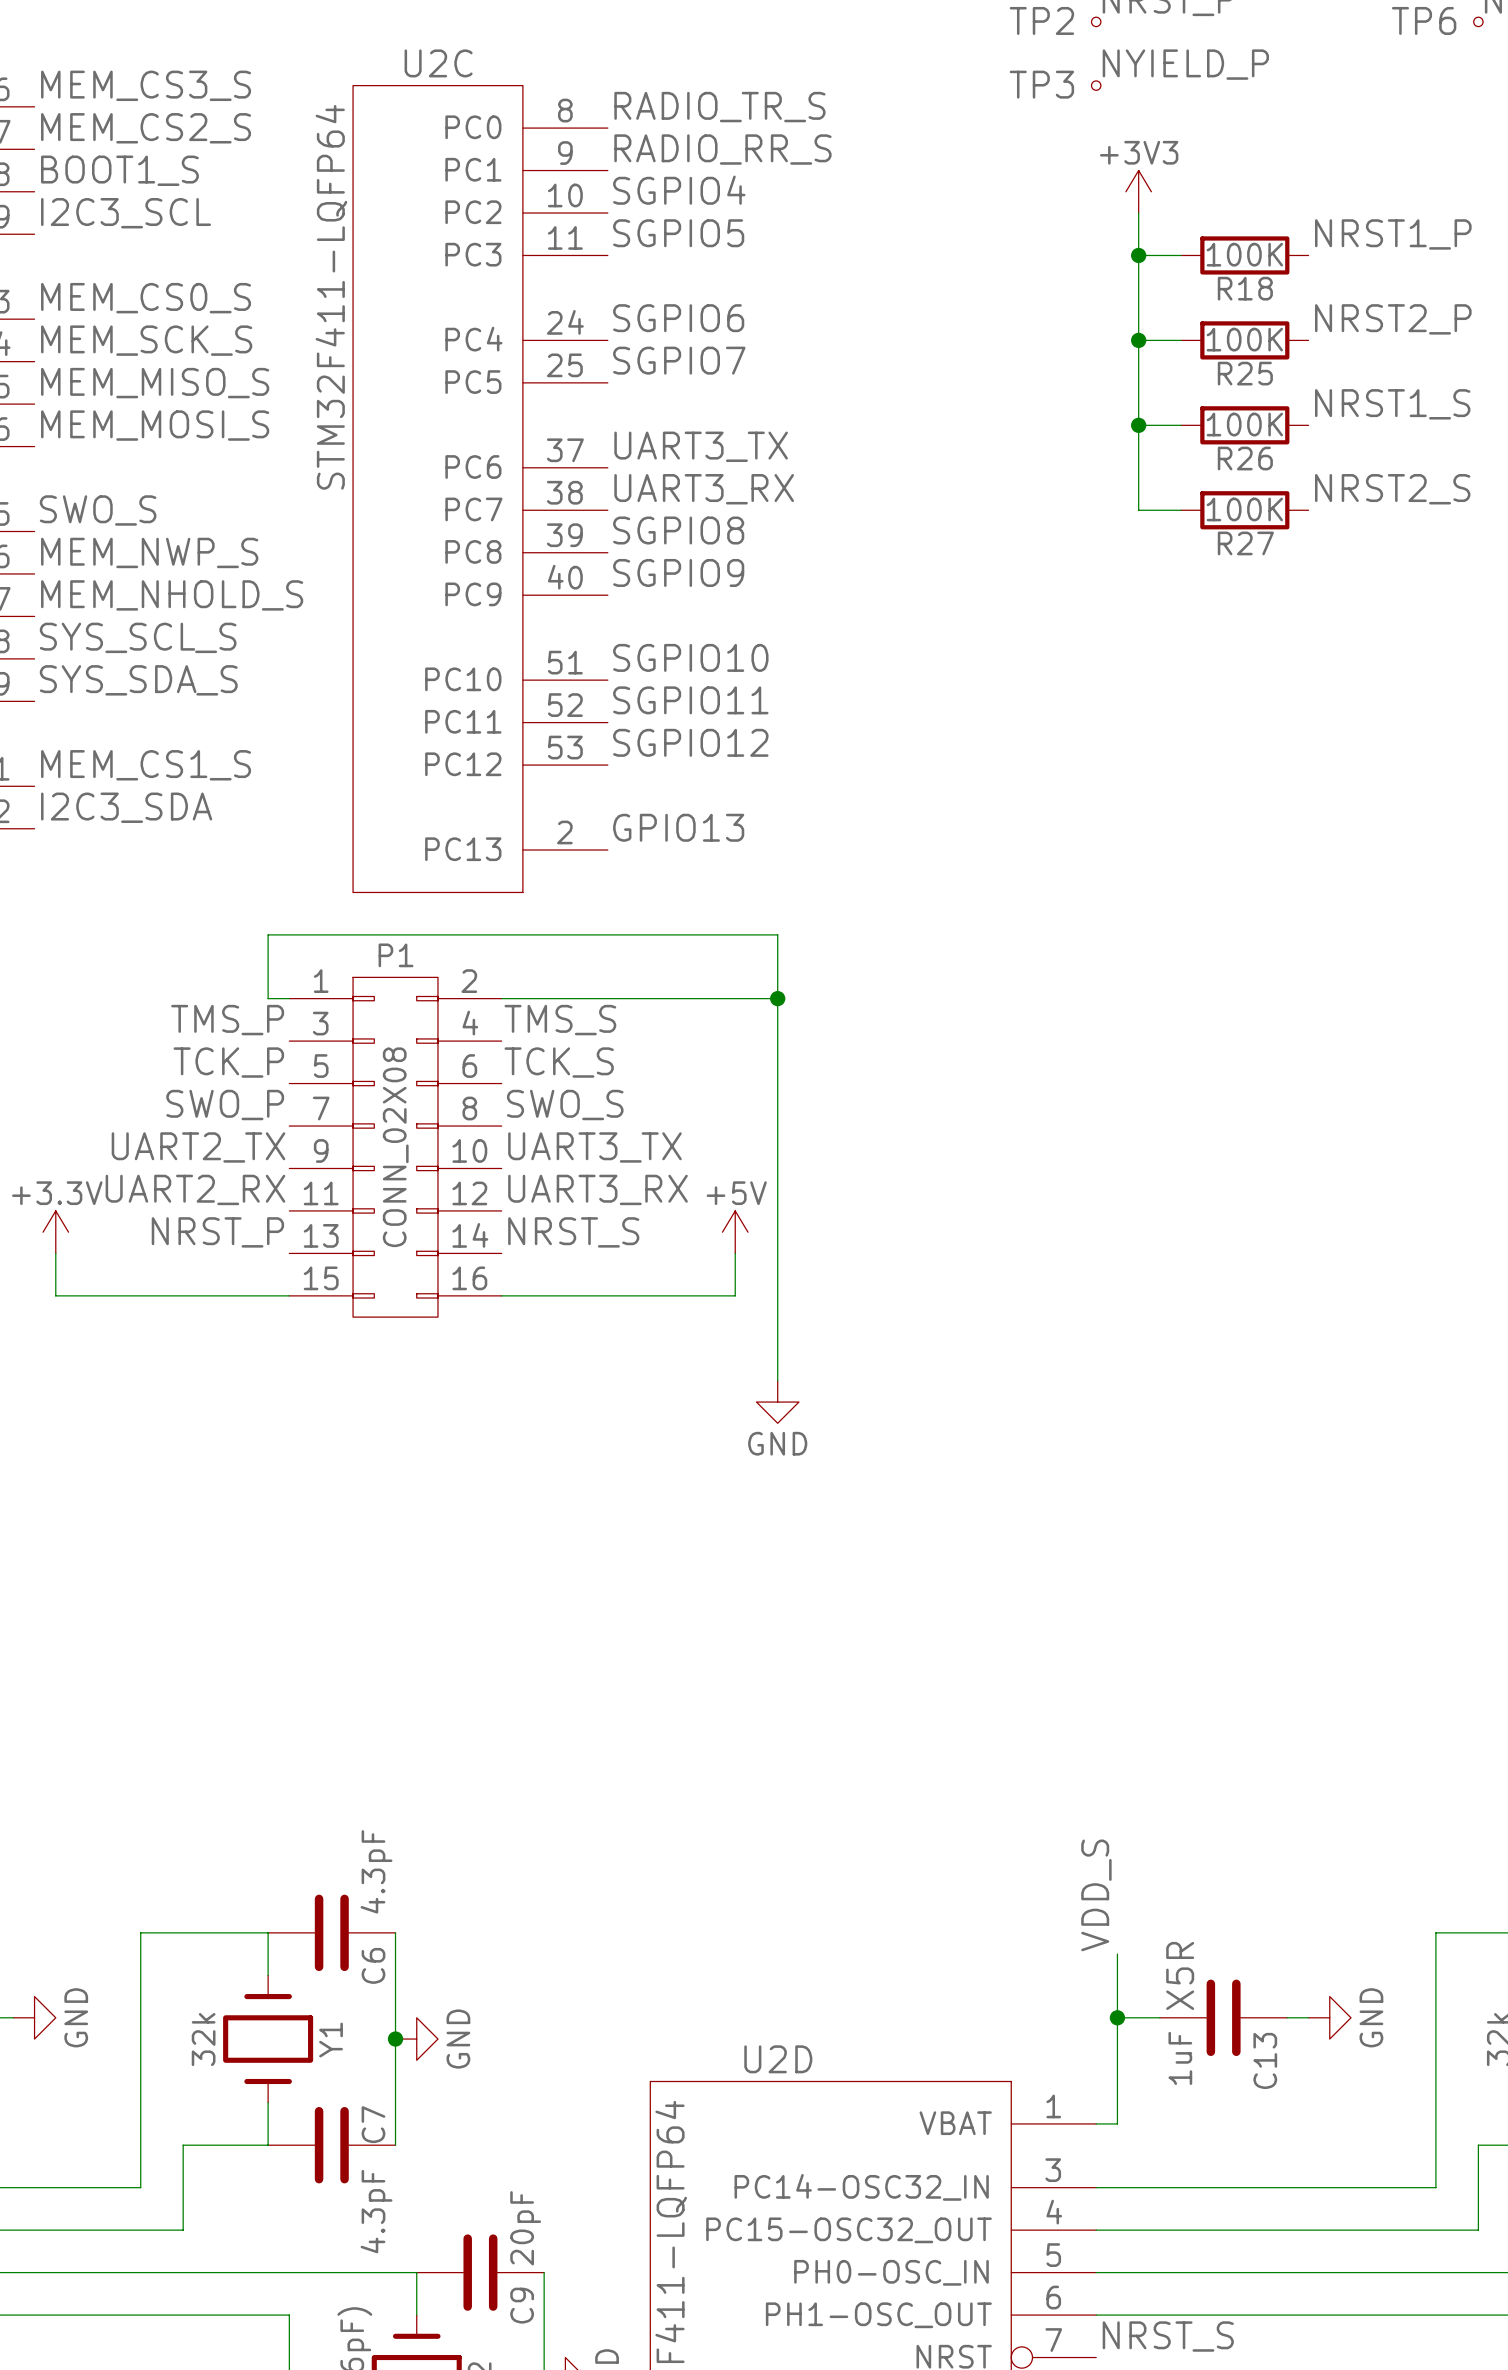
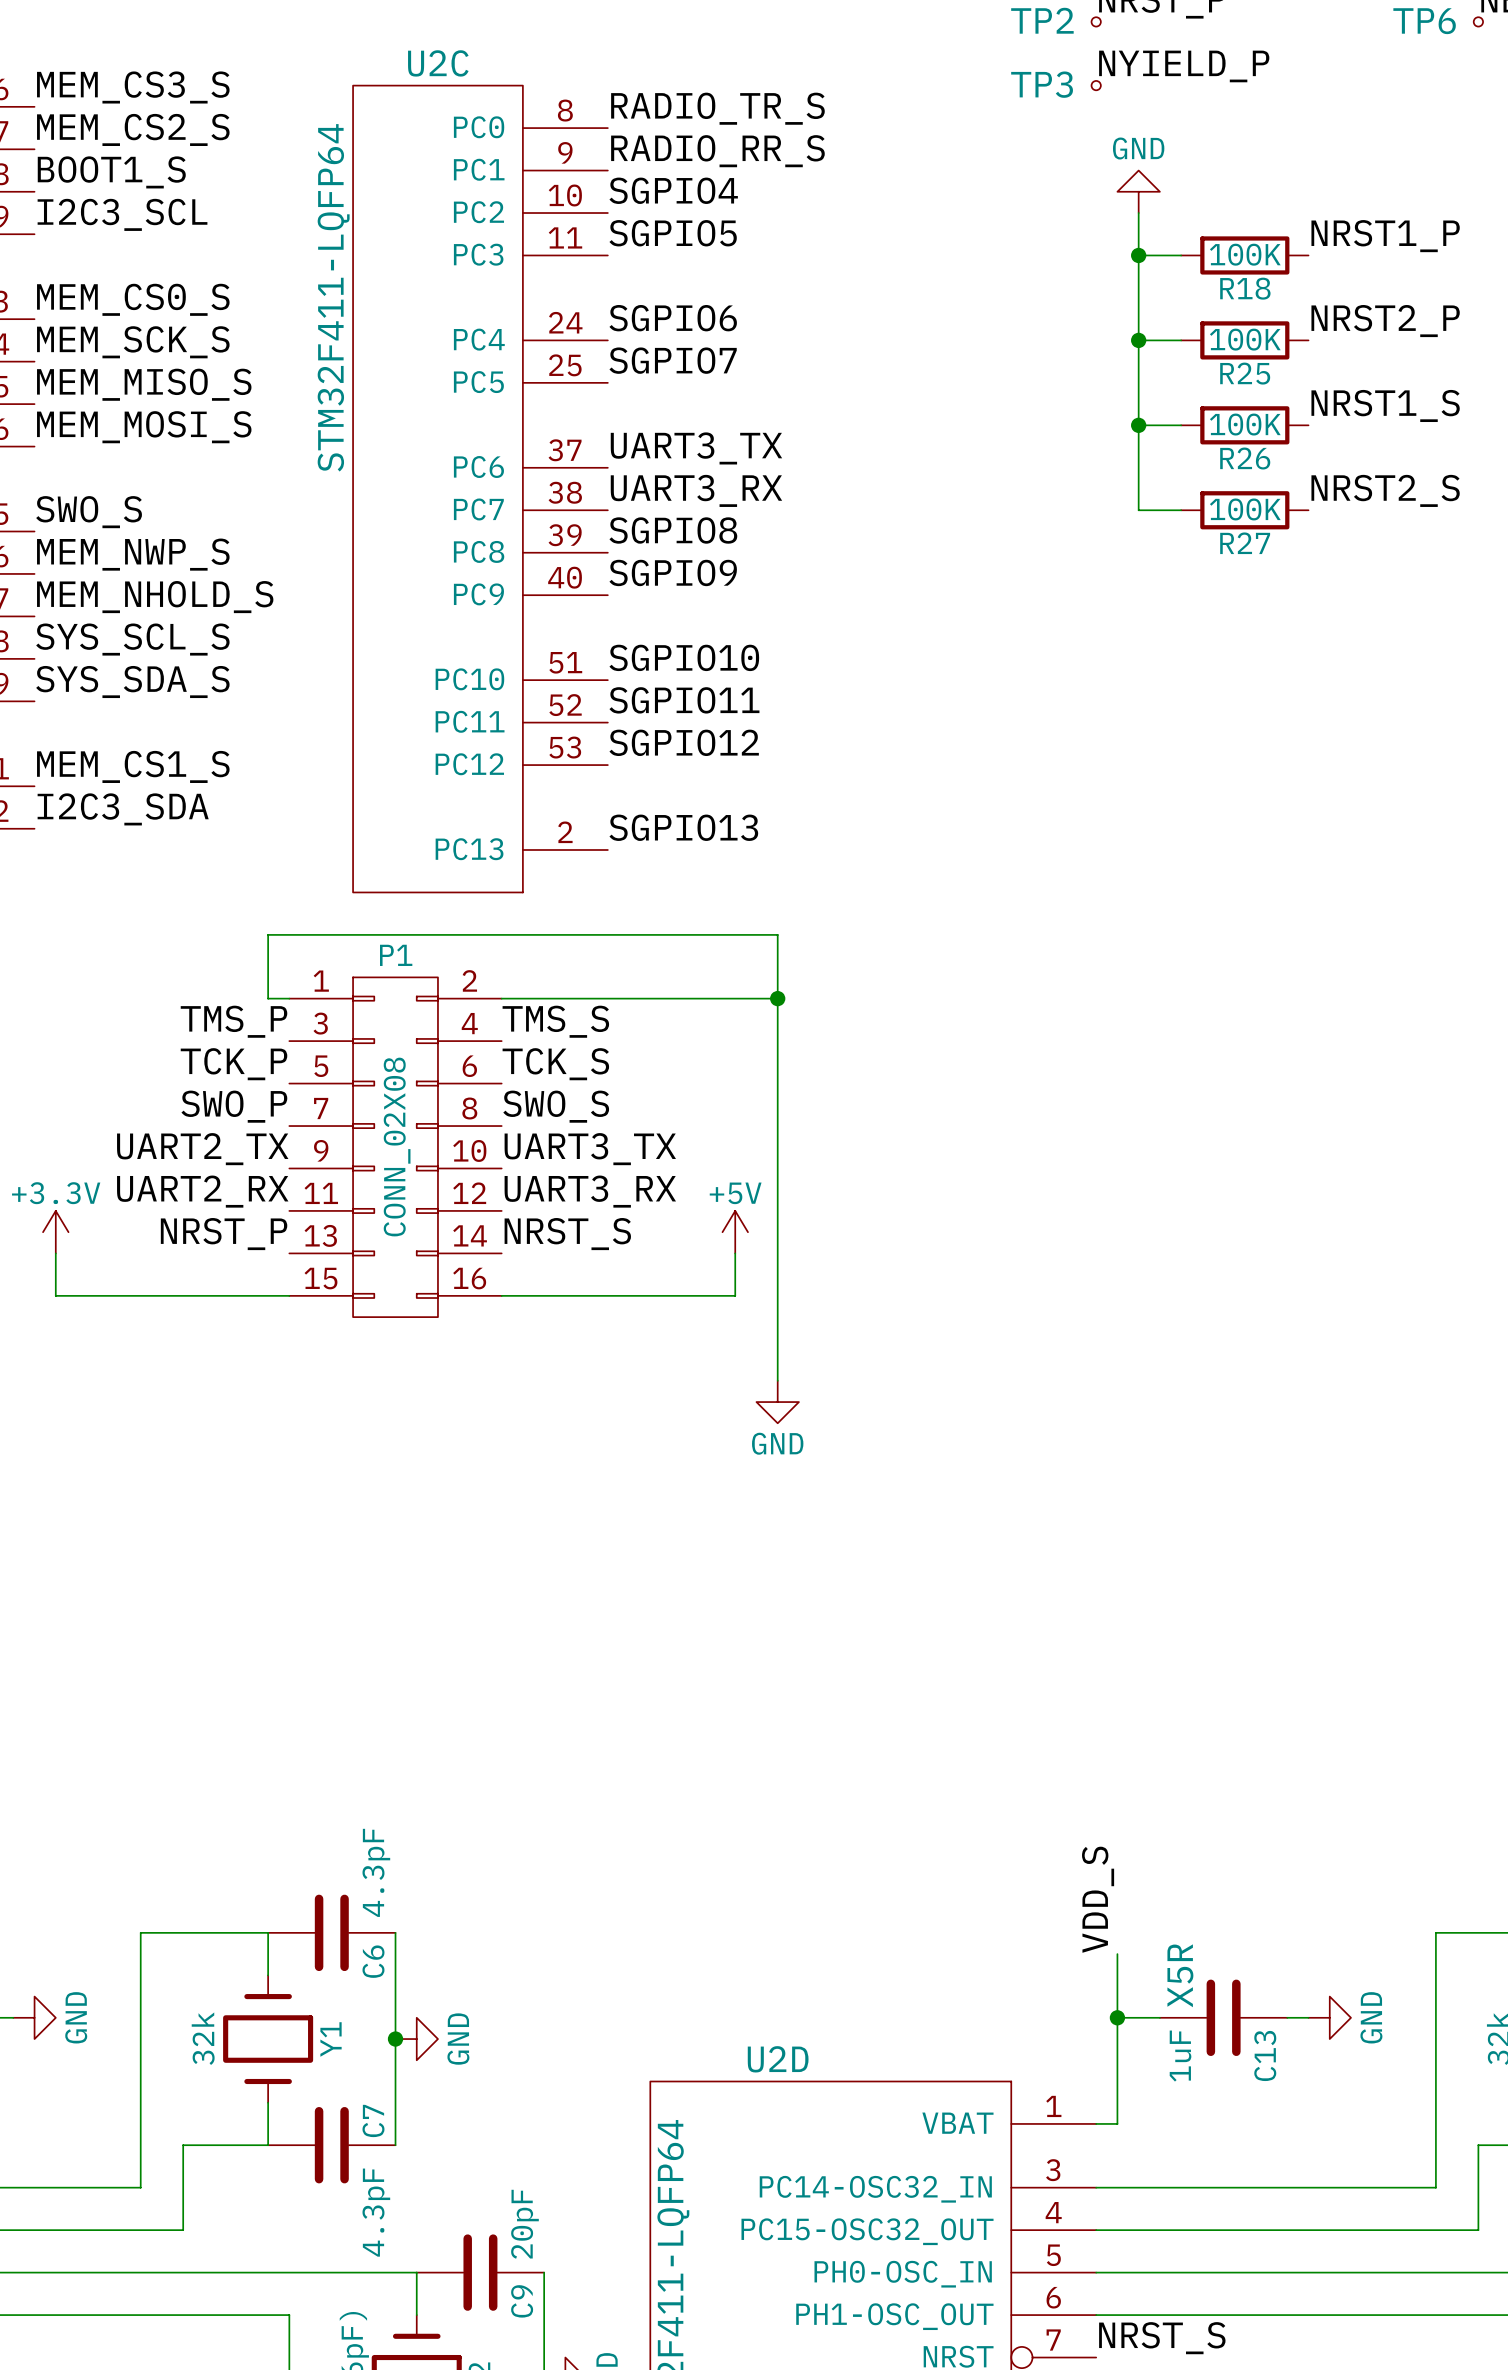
power symbol: +3V3 (1138, 191) -> GND (1138, 191)
label: GPIO13 (678, 827) -> SGPIO13 (683, 827)

